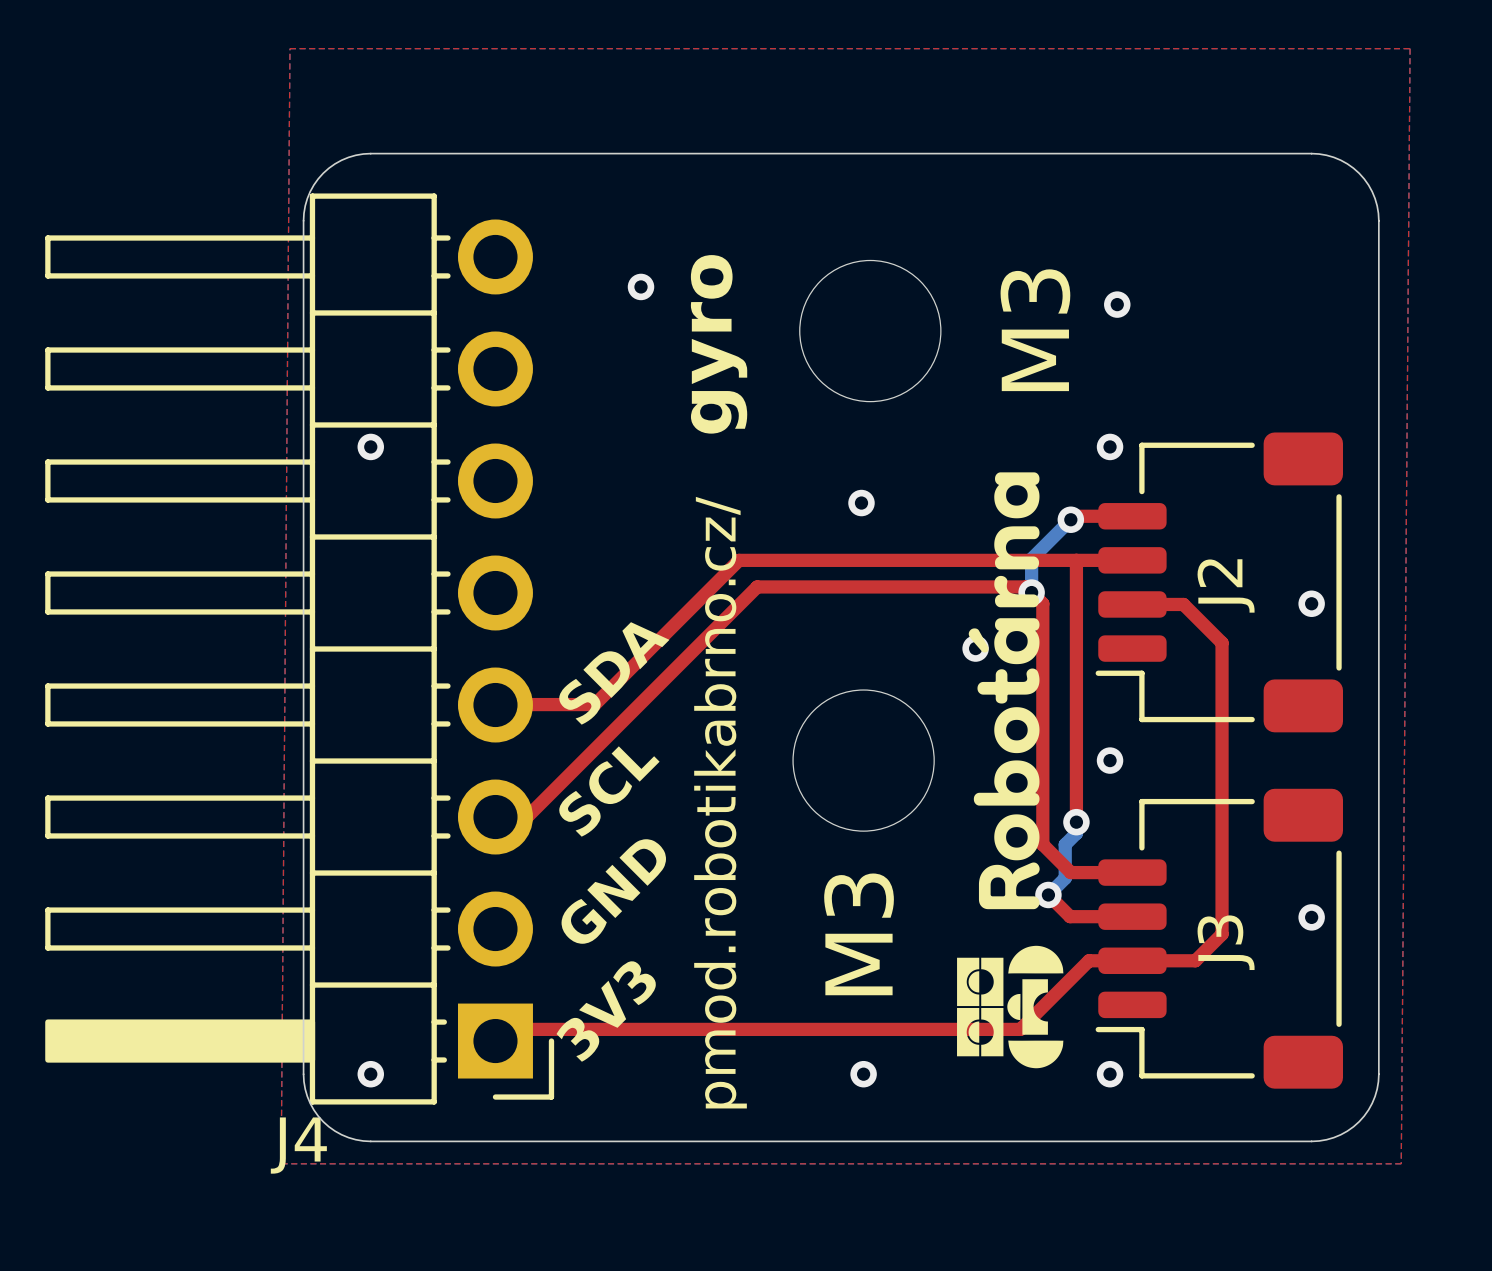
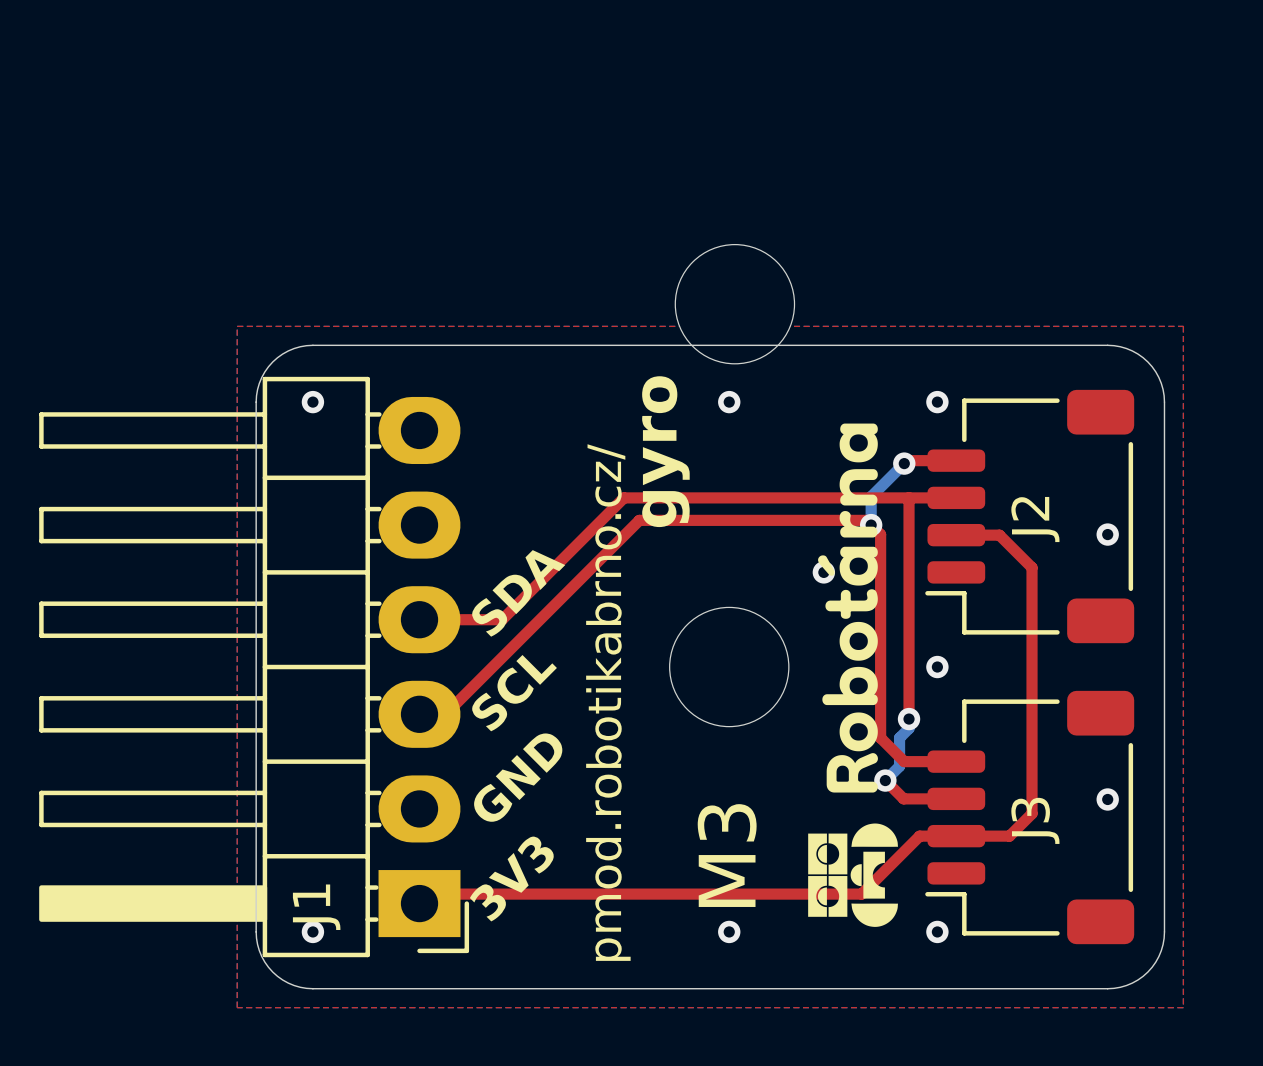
via: (641, 286) -> none
via: (1117, 304) -> none
text: M3 (1035, 330) -> none
text position: gyro (719, 344) -> gyro (665, 451)
board edge: (303, 446) (303, 220) (305, 205) (313, 185) (328, 168) (348, 157) (370, 153) (1311, 153) (1333, 157) (1347, 163) (1364, 178) (1372, 191) (1378, 213) (1378, 446) -> (256, 402) (259, 383) (272, 361) (294, 348) (312, 345) (1114, 345) (1132, 350) (1147, 361) (1161, 383) (1164, 402)
via position: (861, 503) -> (729, 402)
J4: (299, 649) -> none
J1: none -> (254, 667)
text position: M3 (859, 934) -> M3 (727, 855)
top zone outline: (281, 1163) (289, 48) (1410, 48) (1401, 1163) -> (237, 1007) (237, 326) (1183, 326) (1183, 1007)

